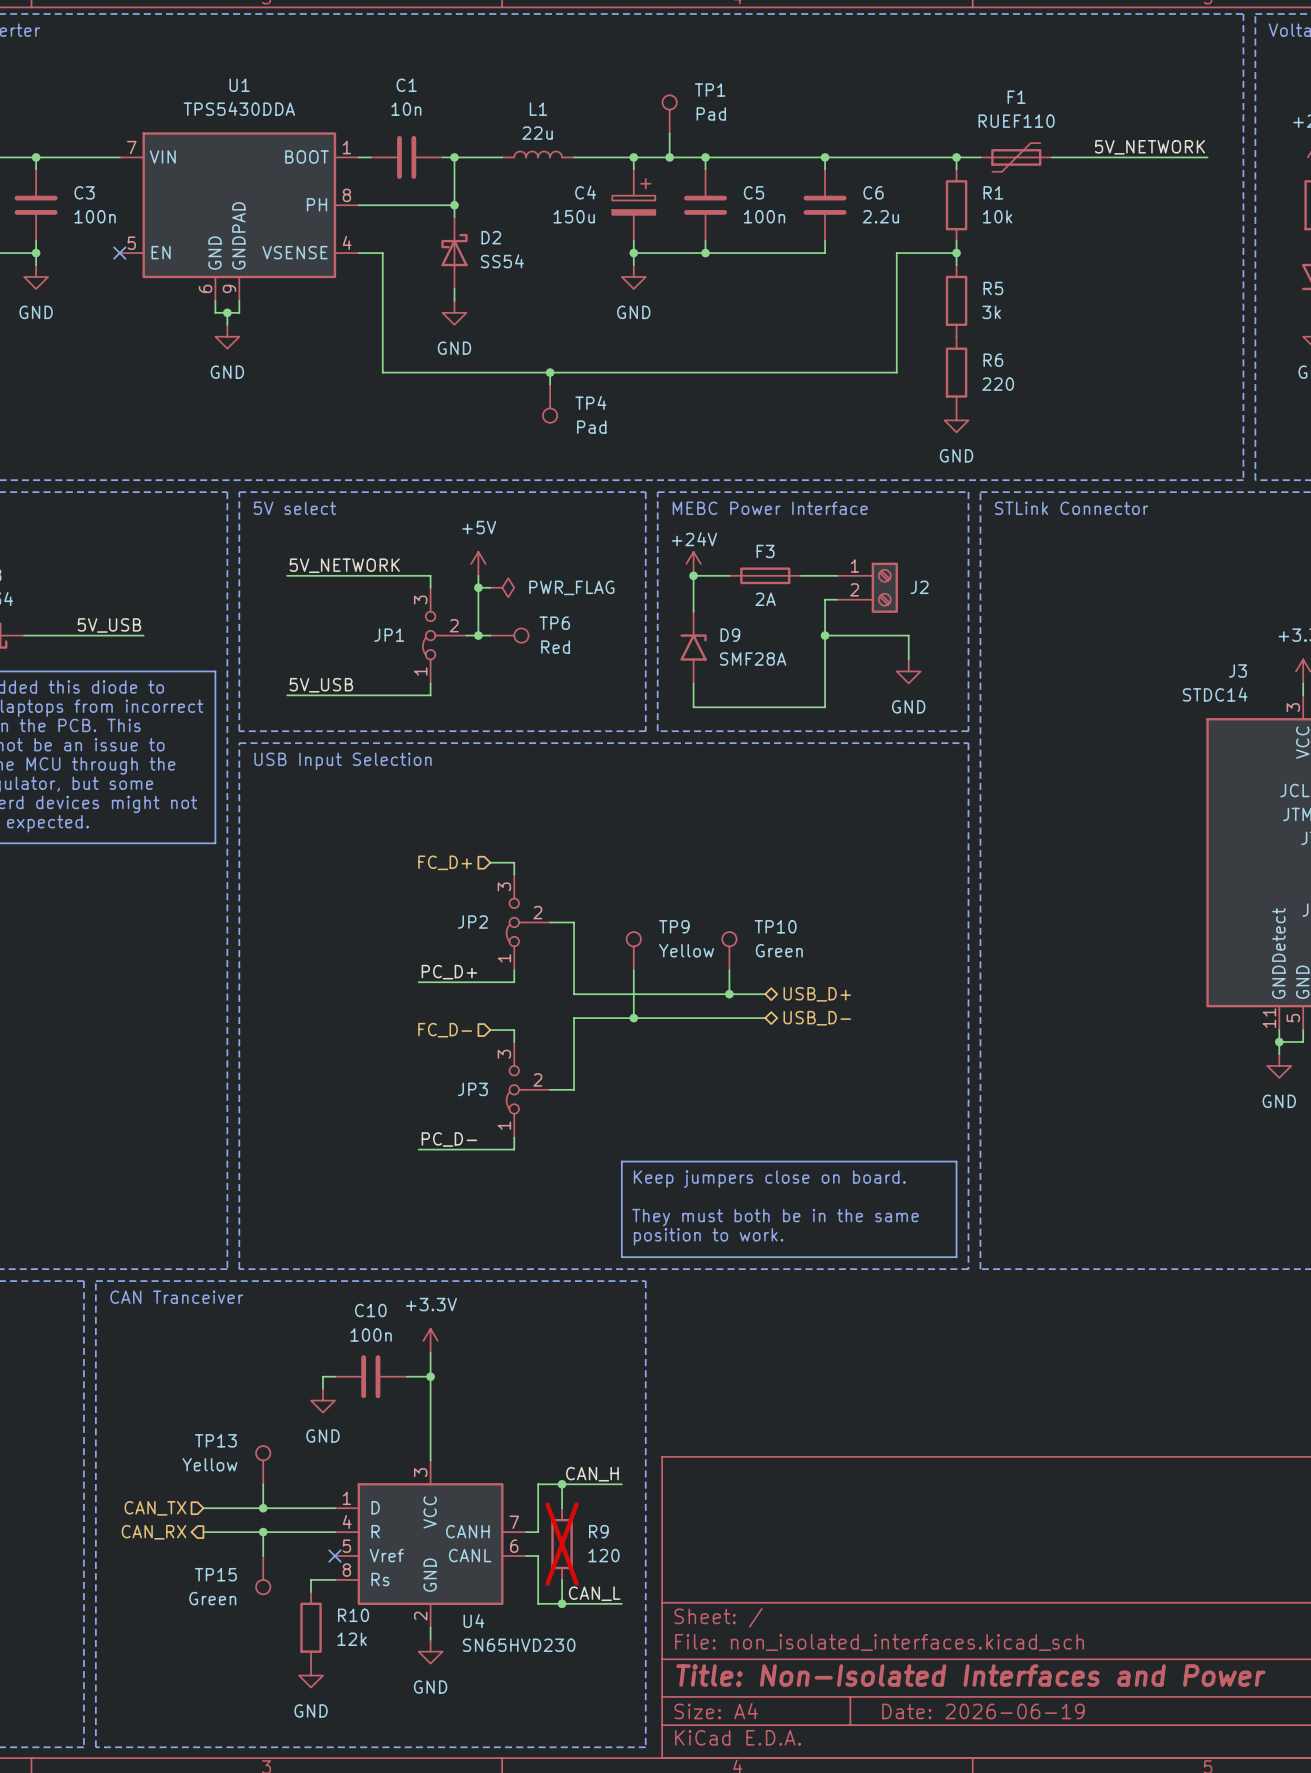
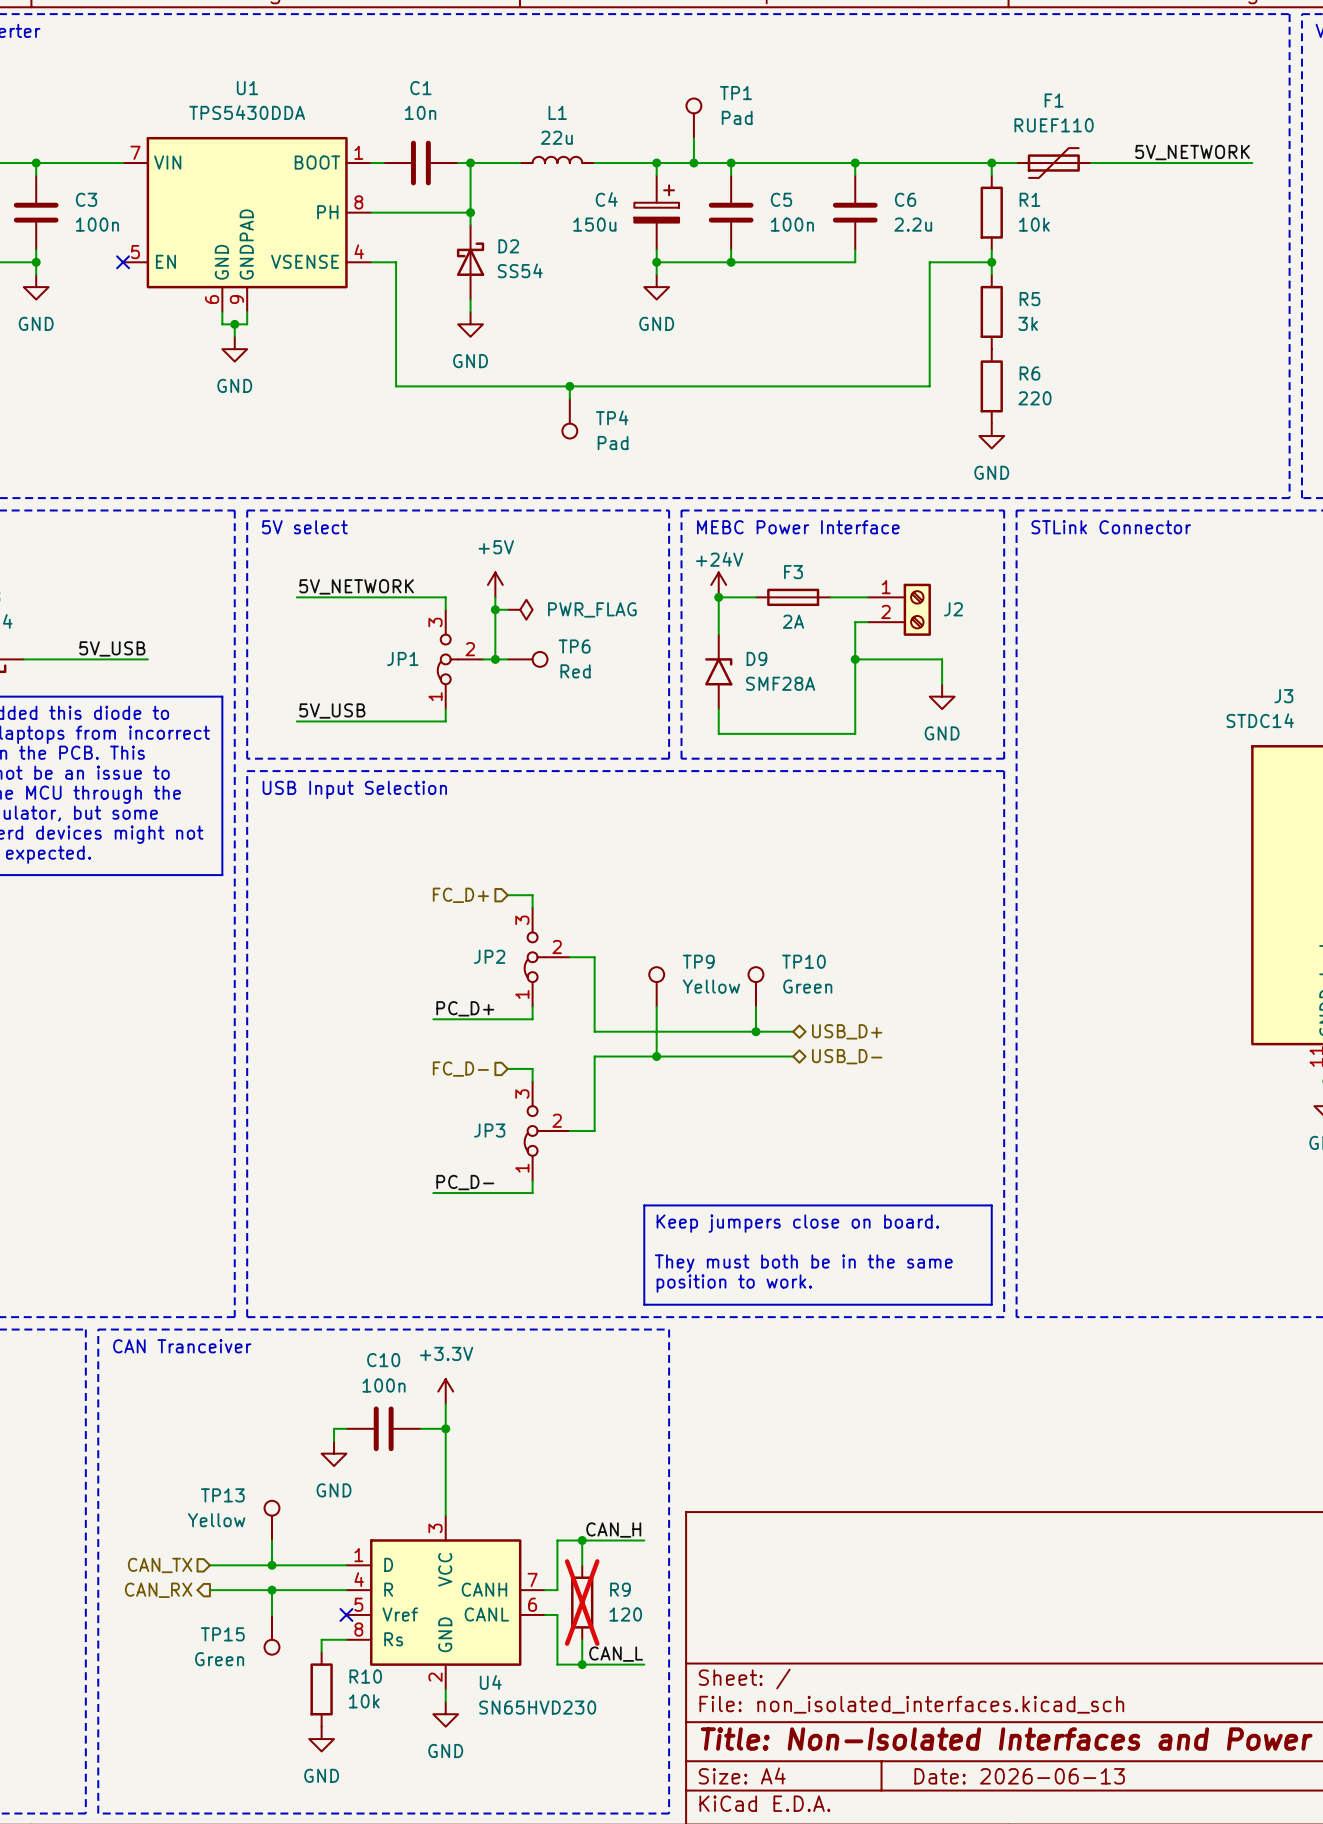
R10 value: 12k (352, 1639) -> 10k (364, 1701)
title block: Date: 2026-06-19 (983, 1711) -> Date: 2026-06-13 (1019, 1776)

